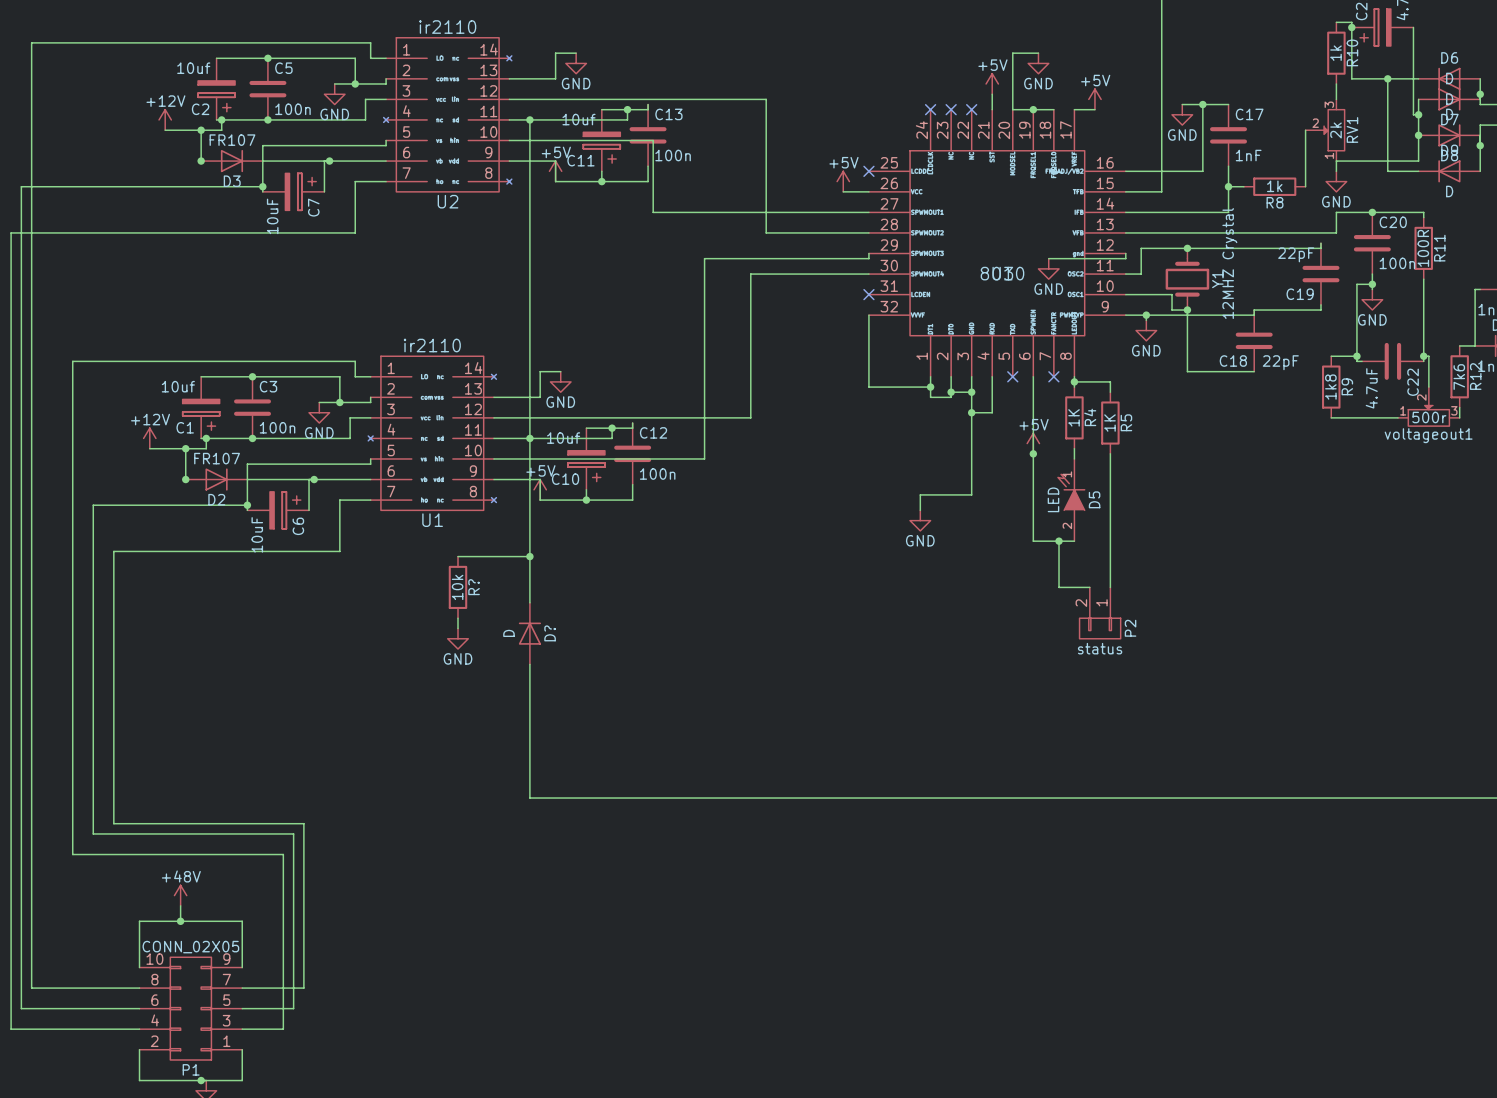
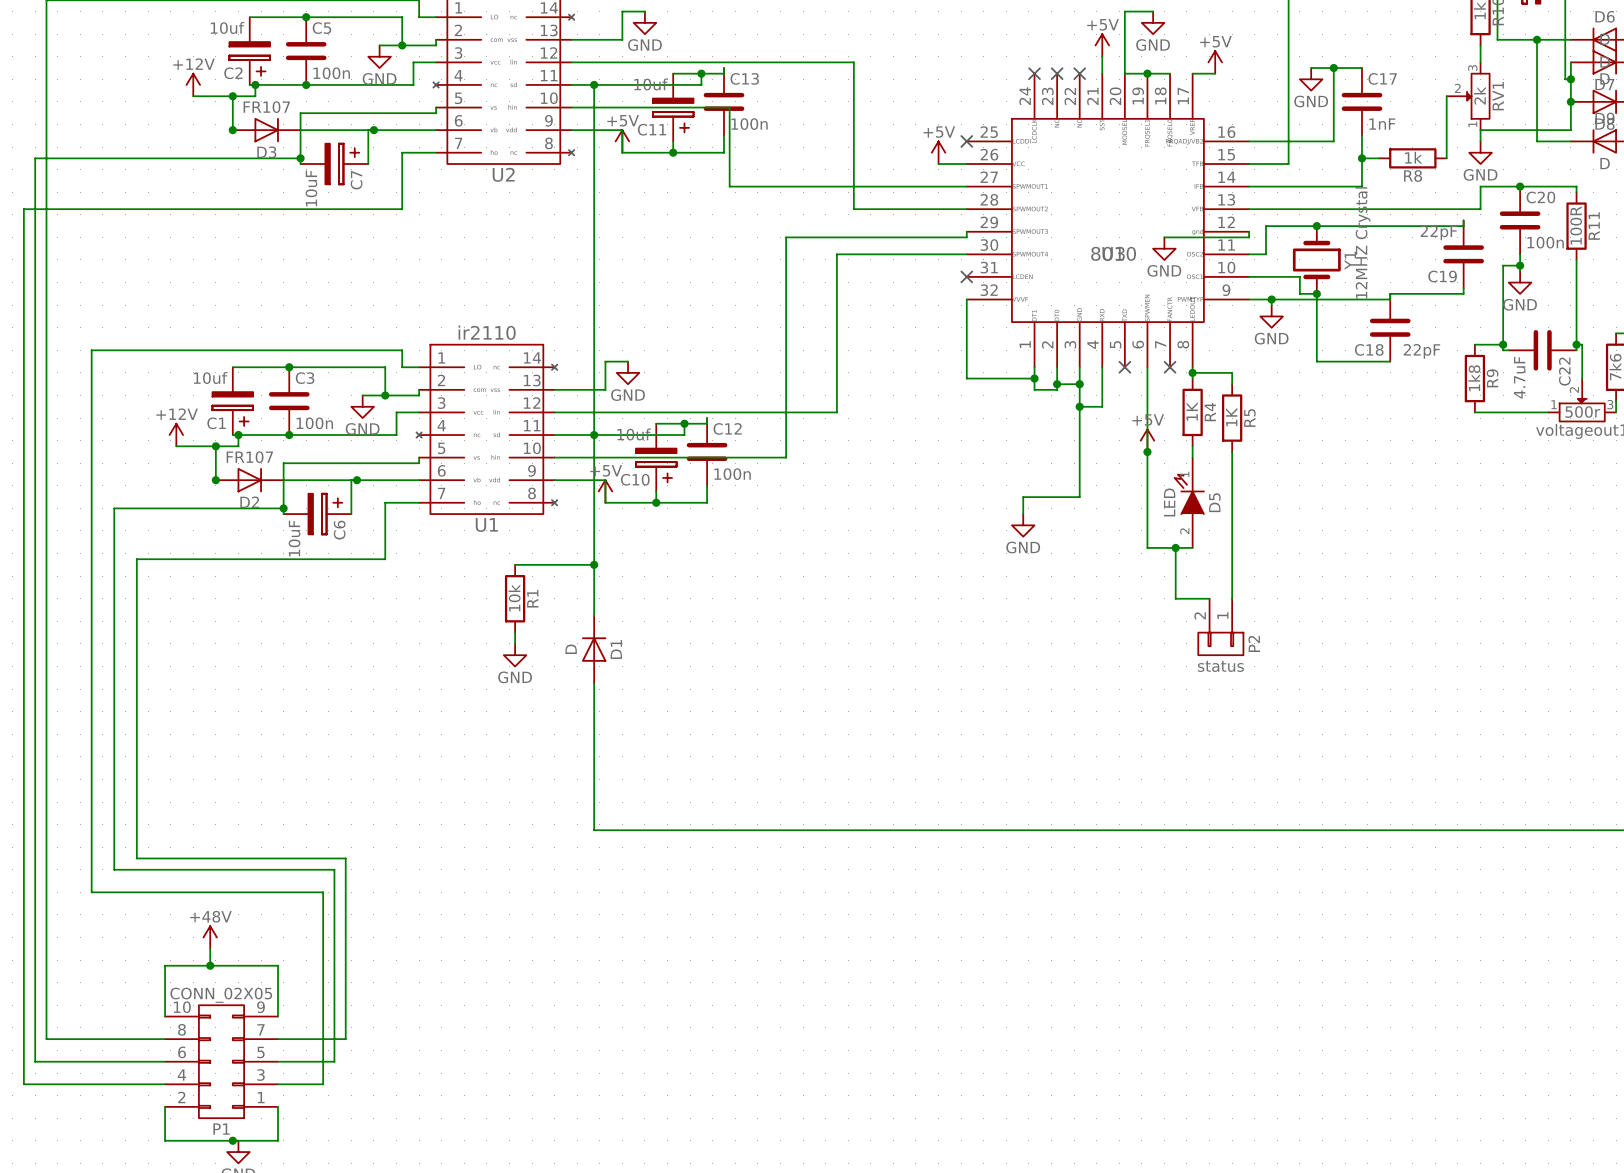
R? name: R? (474, 587) -> R1 (532, 598)
D? name: D? (550, 633) -> D1 (616, 649)

